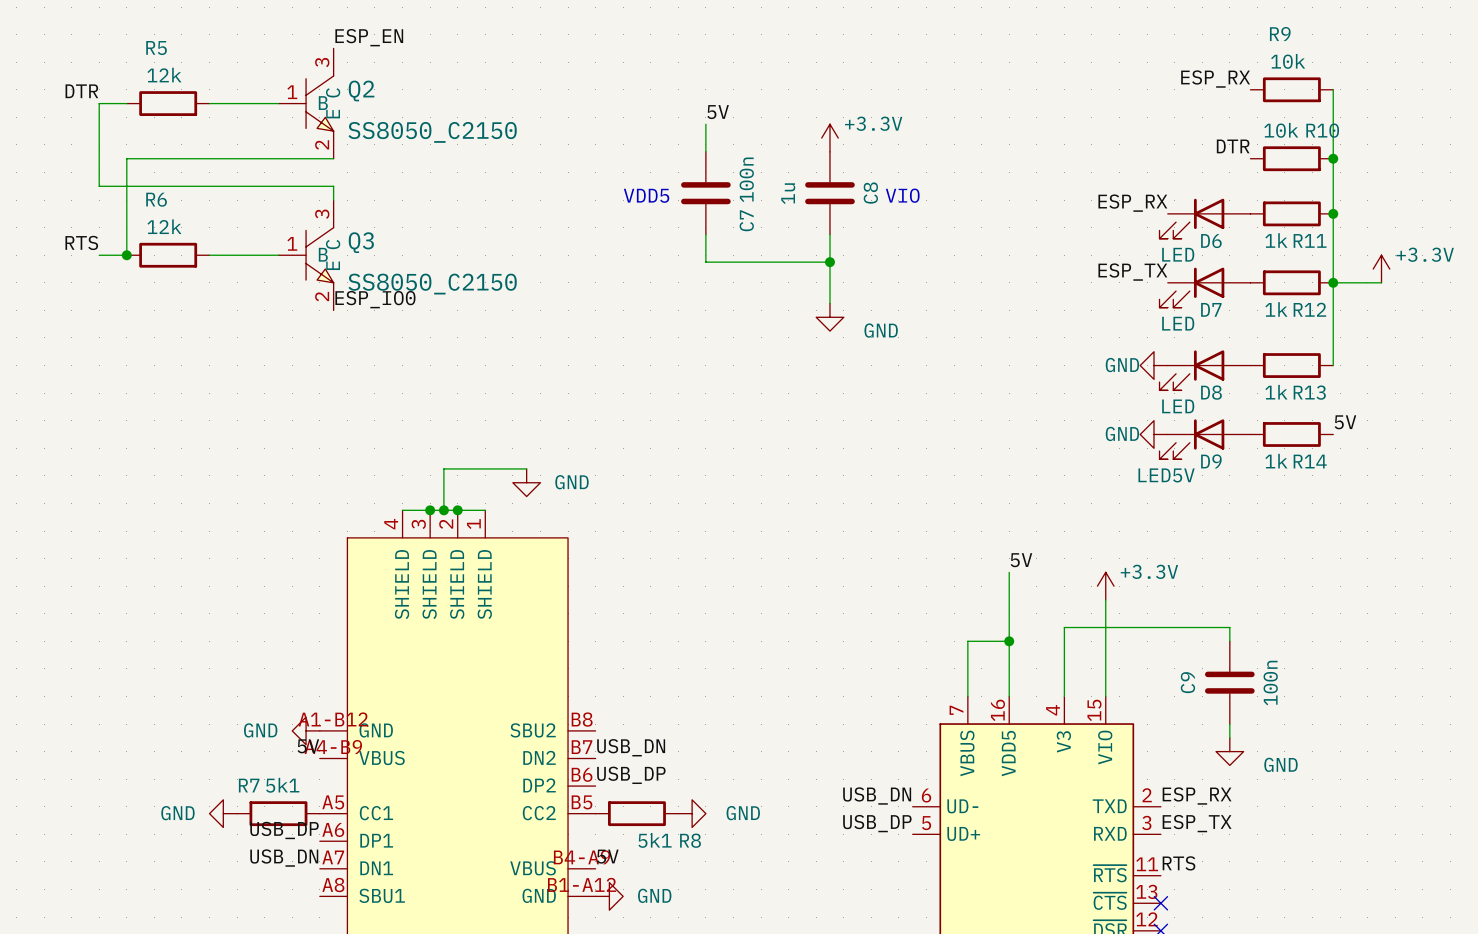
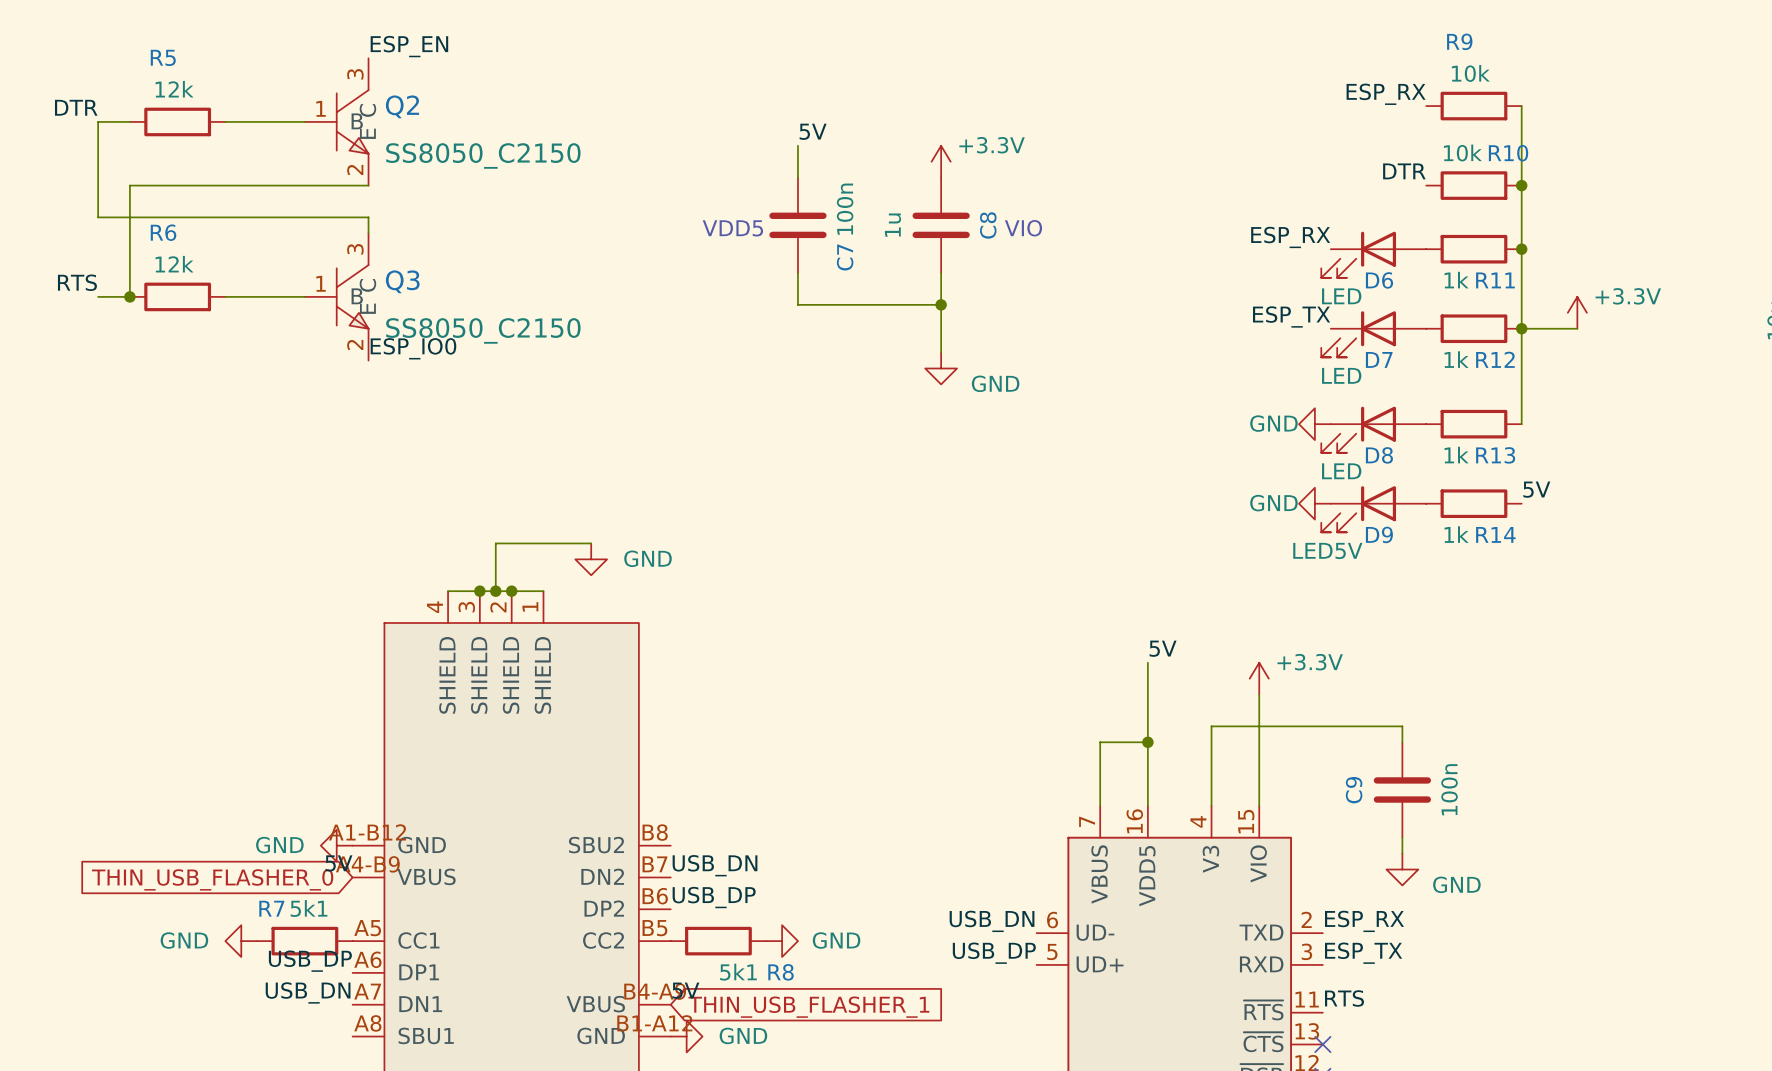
global label: none -> THIN_USB_FLASHER_0 (212, 879)
global label: none -> THIN_USB_FLASHER_1 (808, 1007)

